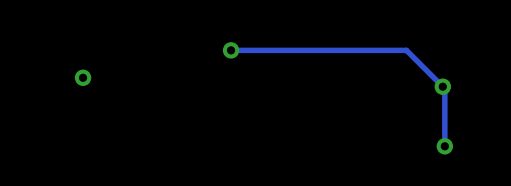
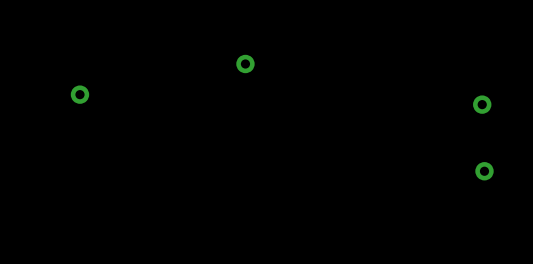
track: (231, 50) (406, 50) (444, 88) (444, 146) -> none

